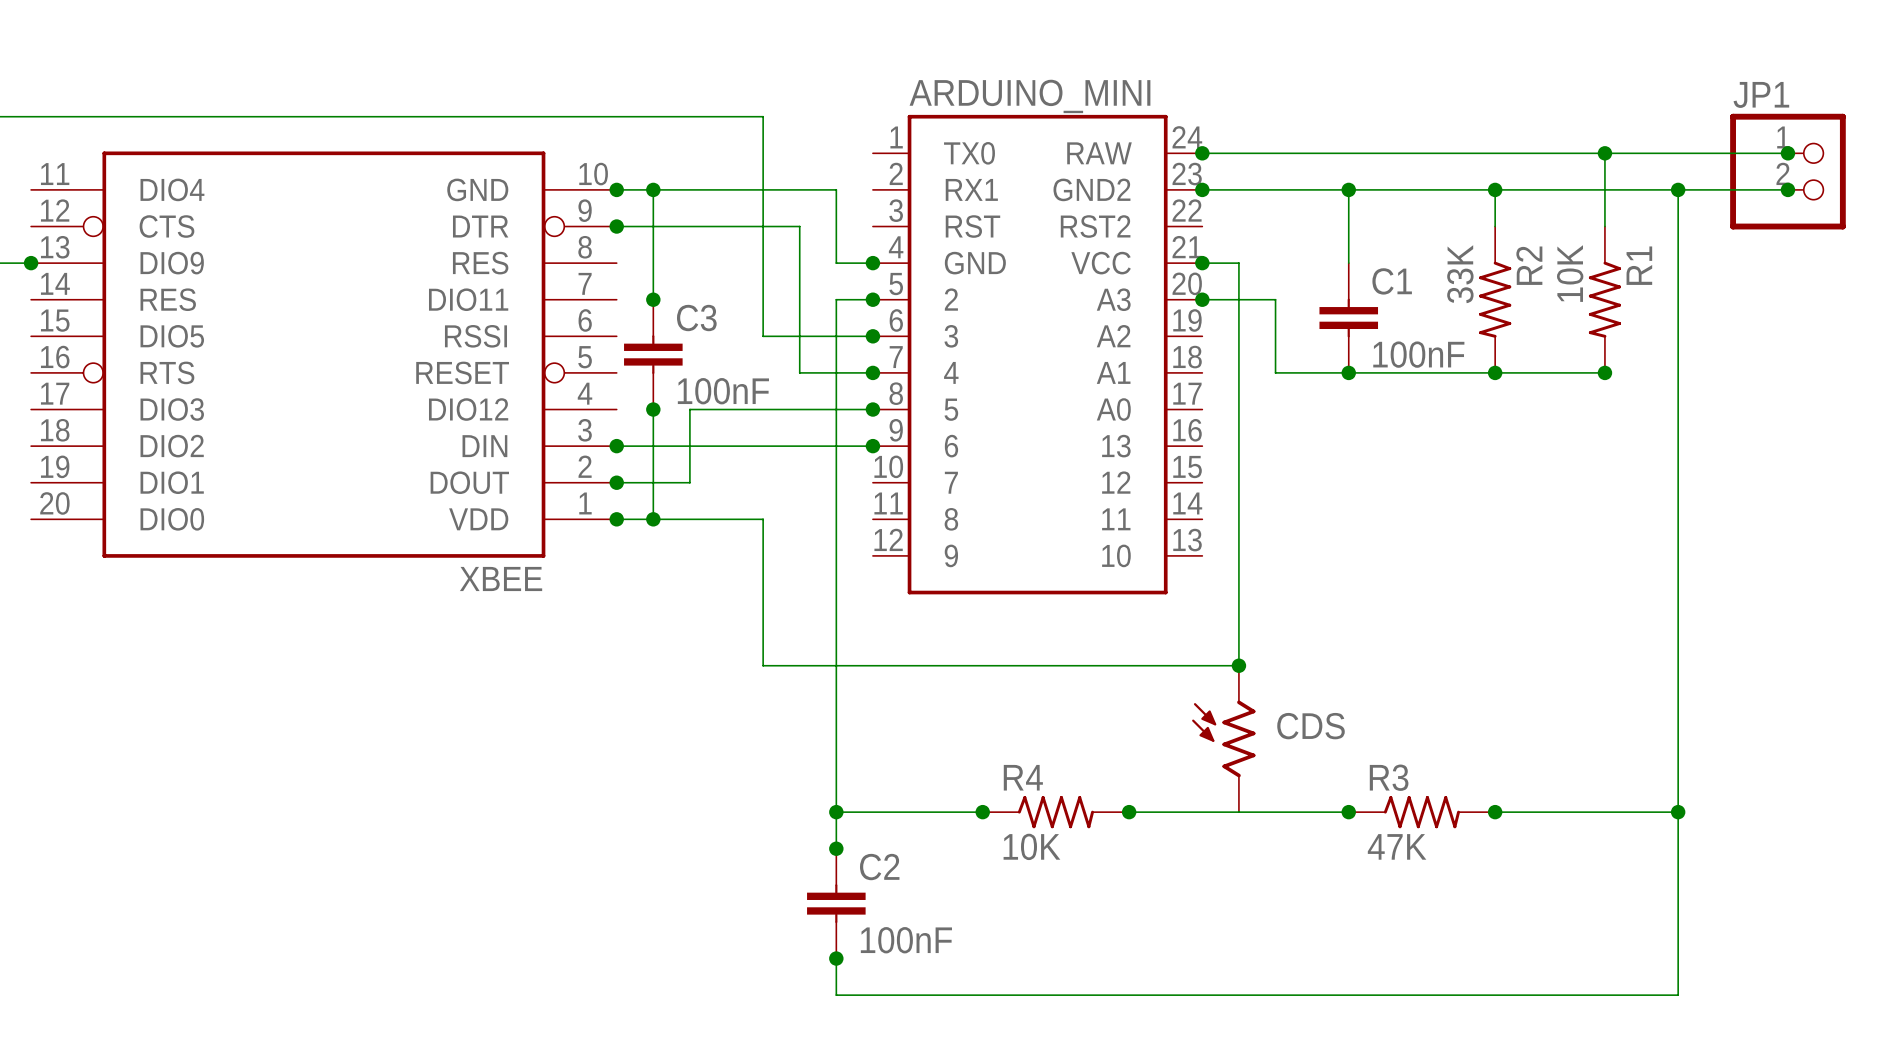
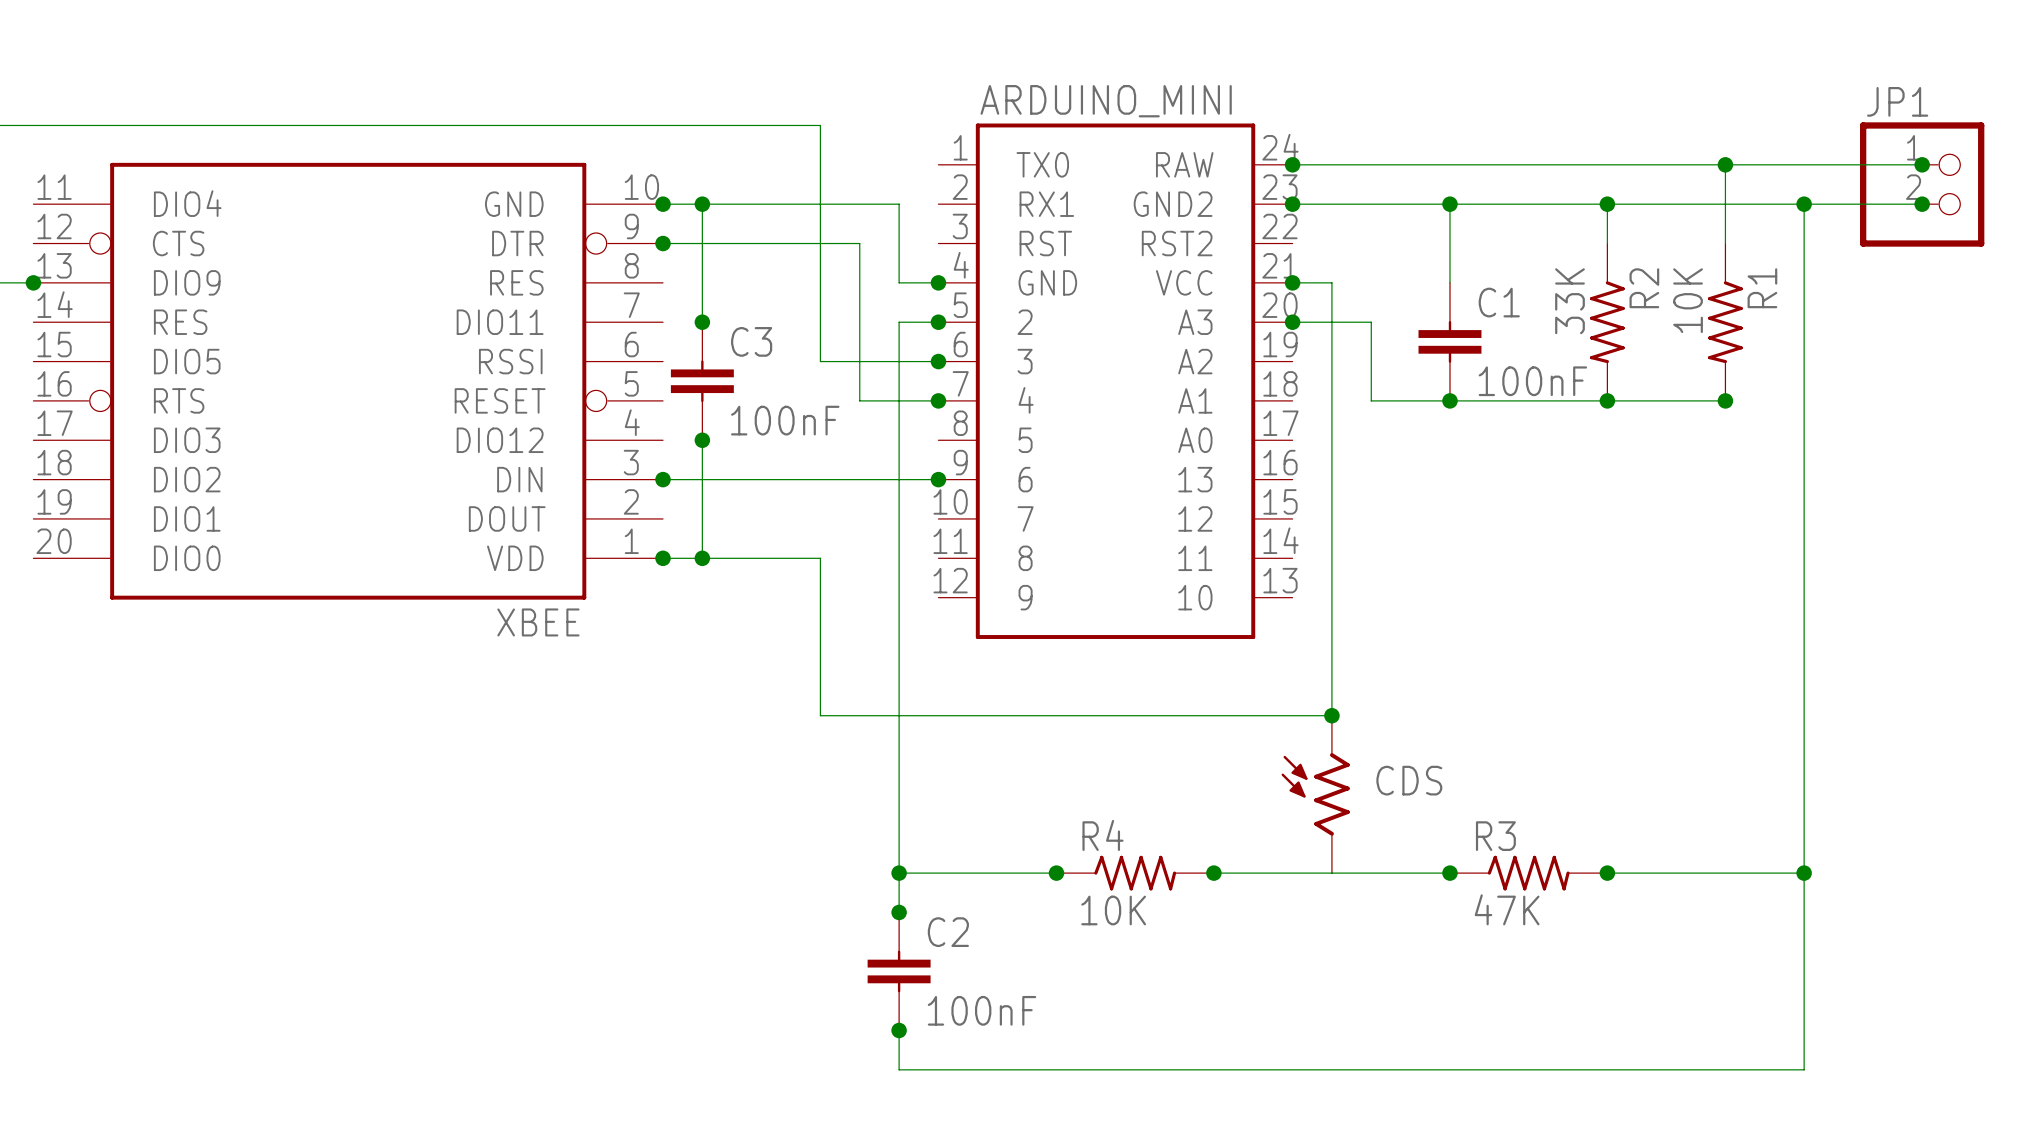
wire: (872, 409) (689, 409) (689, 482) (616, 482) -> none
junction: (872, 409) -> none
junction: (616, 482) -> none

